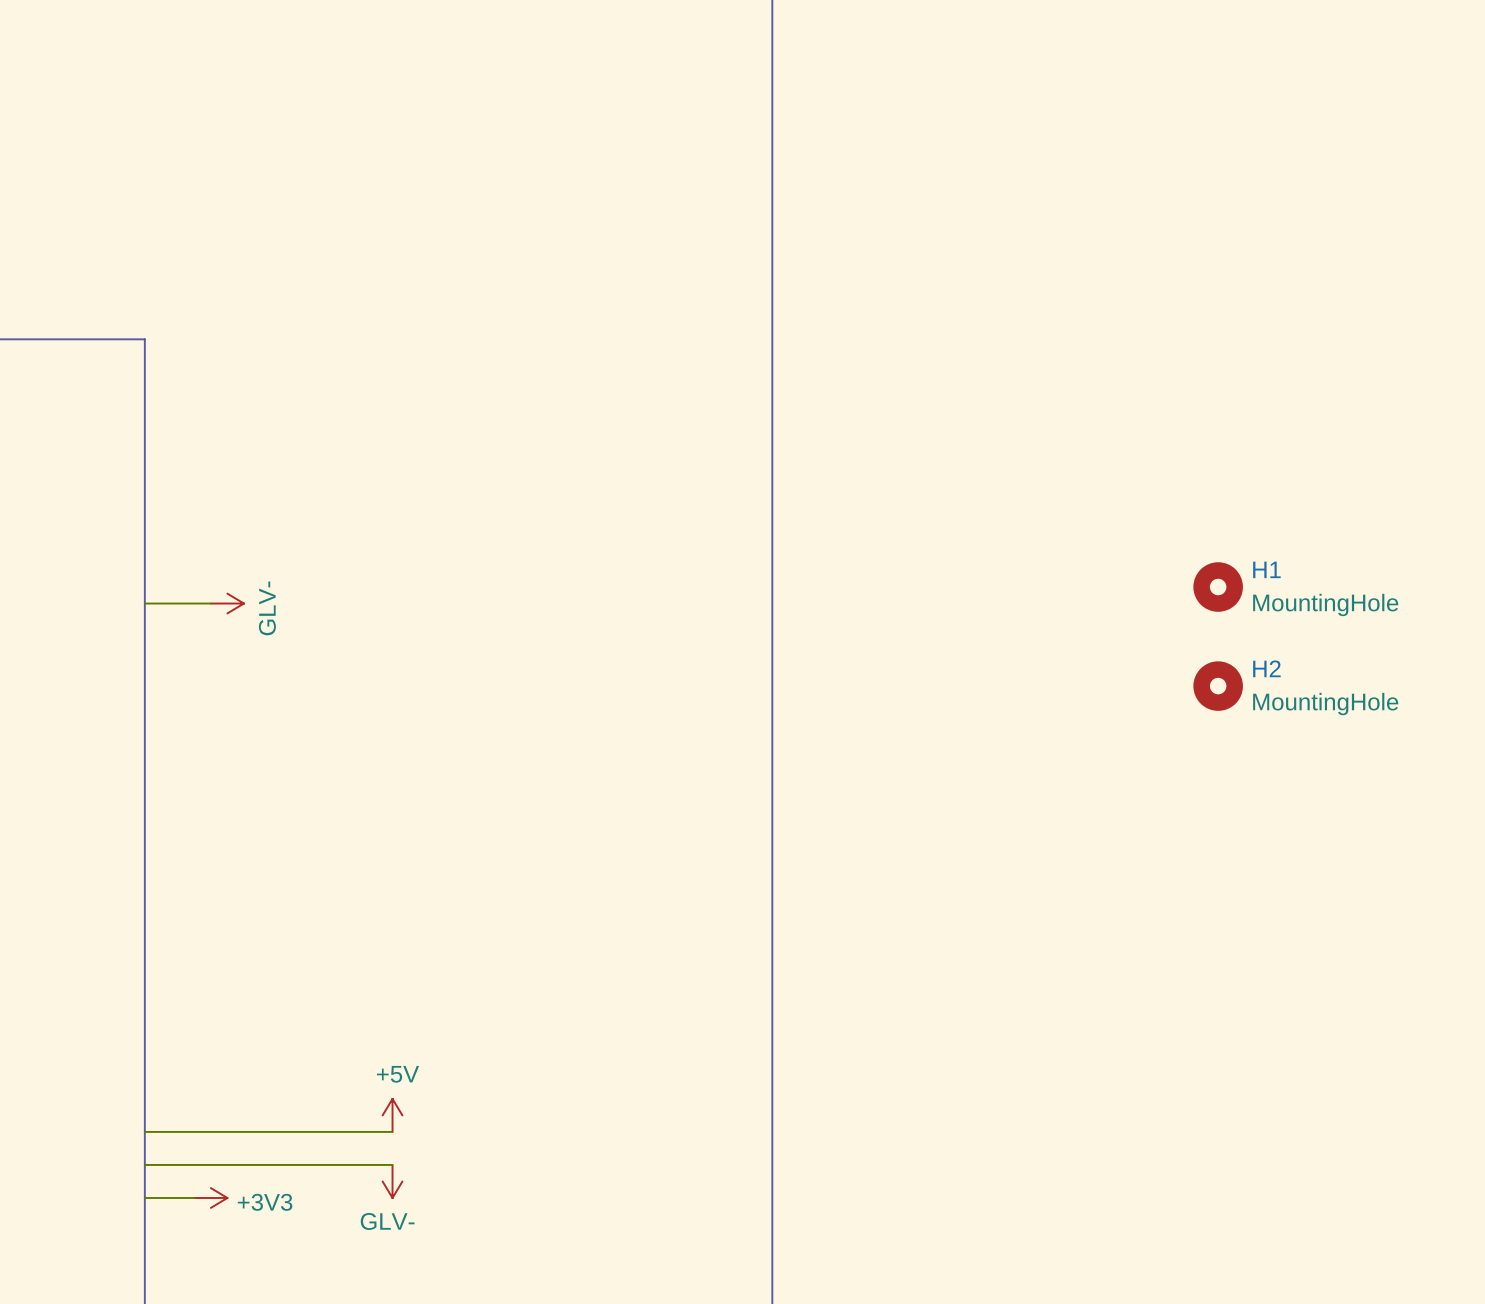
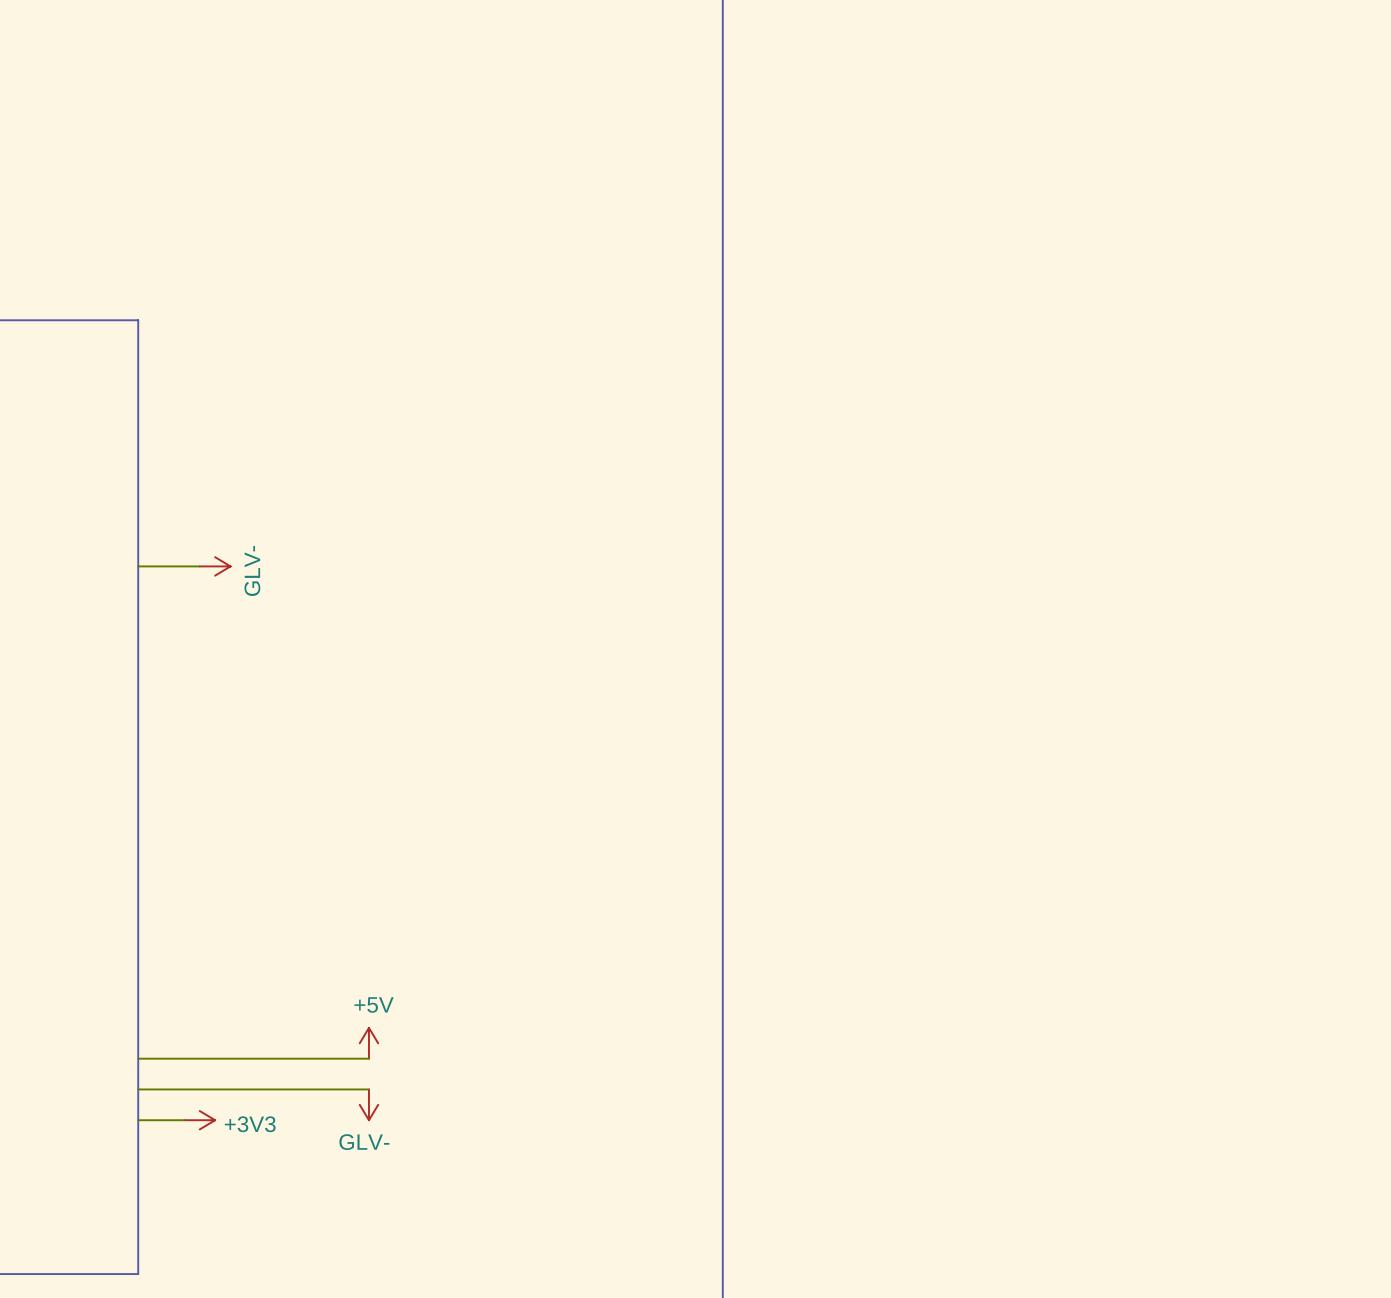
H1: MountingHole (1218, 587) -> none
H2: MountingHole (1218, 686) -> none

